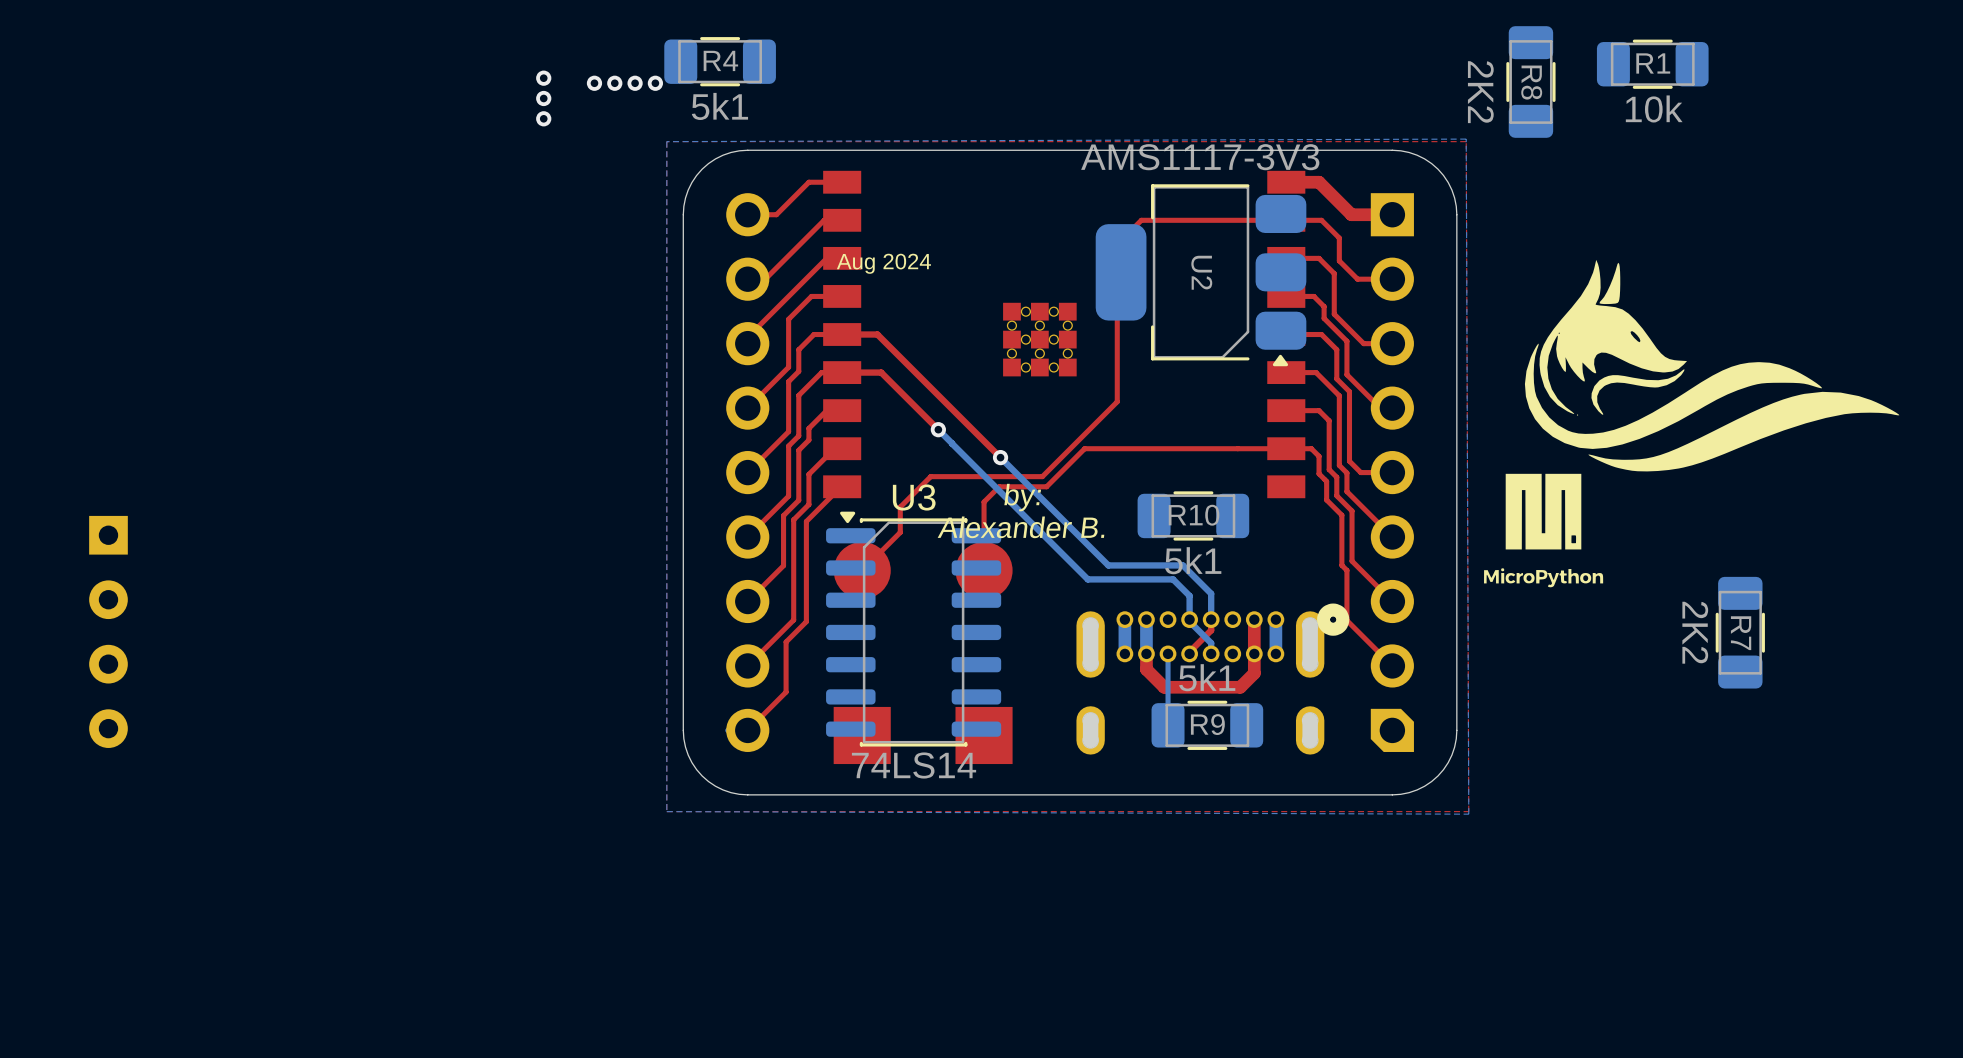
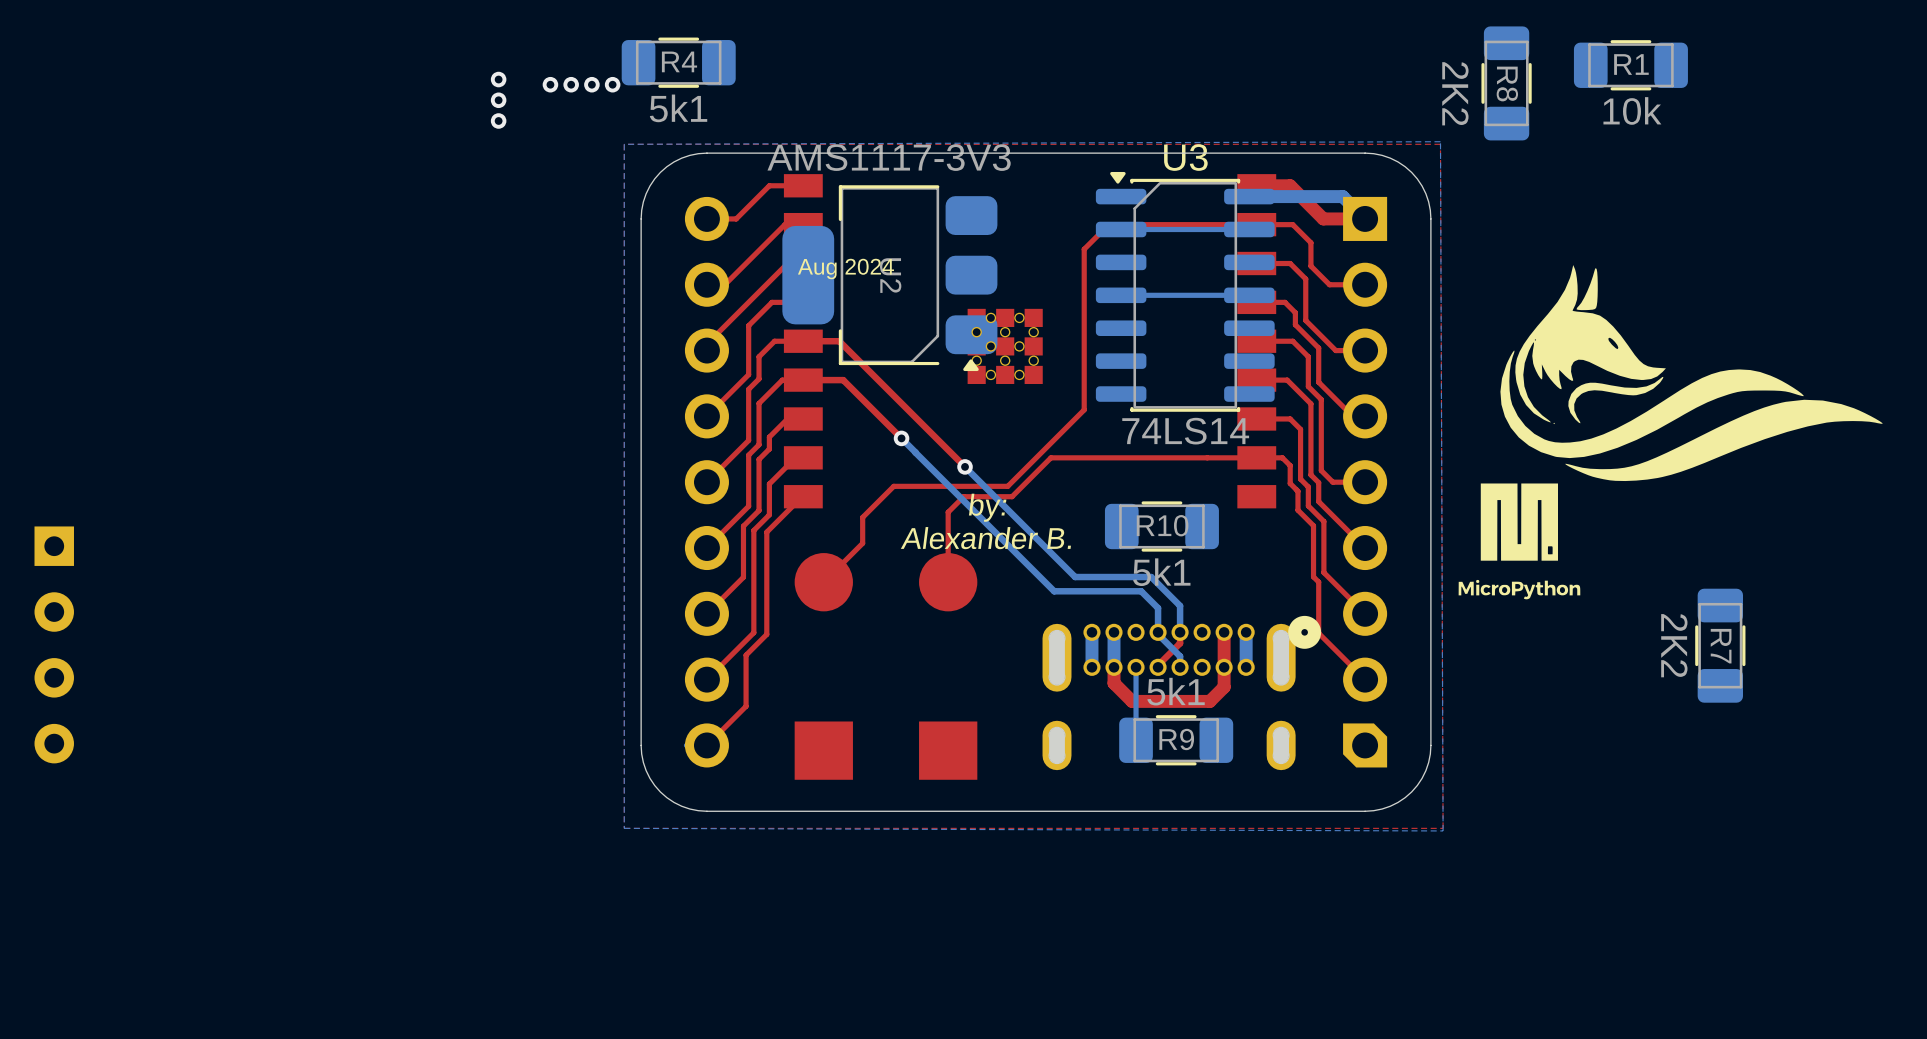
bottom track: none -> (1249, 196) (1342, 196) (1365, 218)
bottom track: none -> (1249, 229) (1121, 229)
U2 position: (1201, 275) -> (889, 278)
bottom track: none -> (1249, 295) (1121, 295)
U3 position: (913, 629) -> (1185, 291)

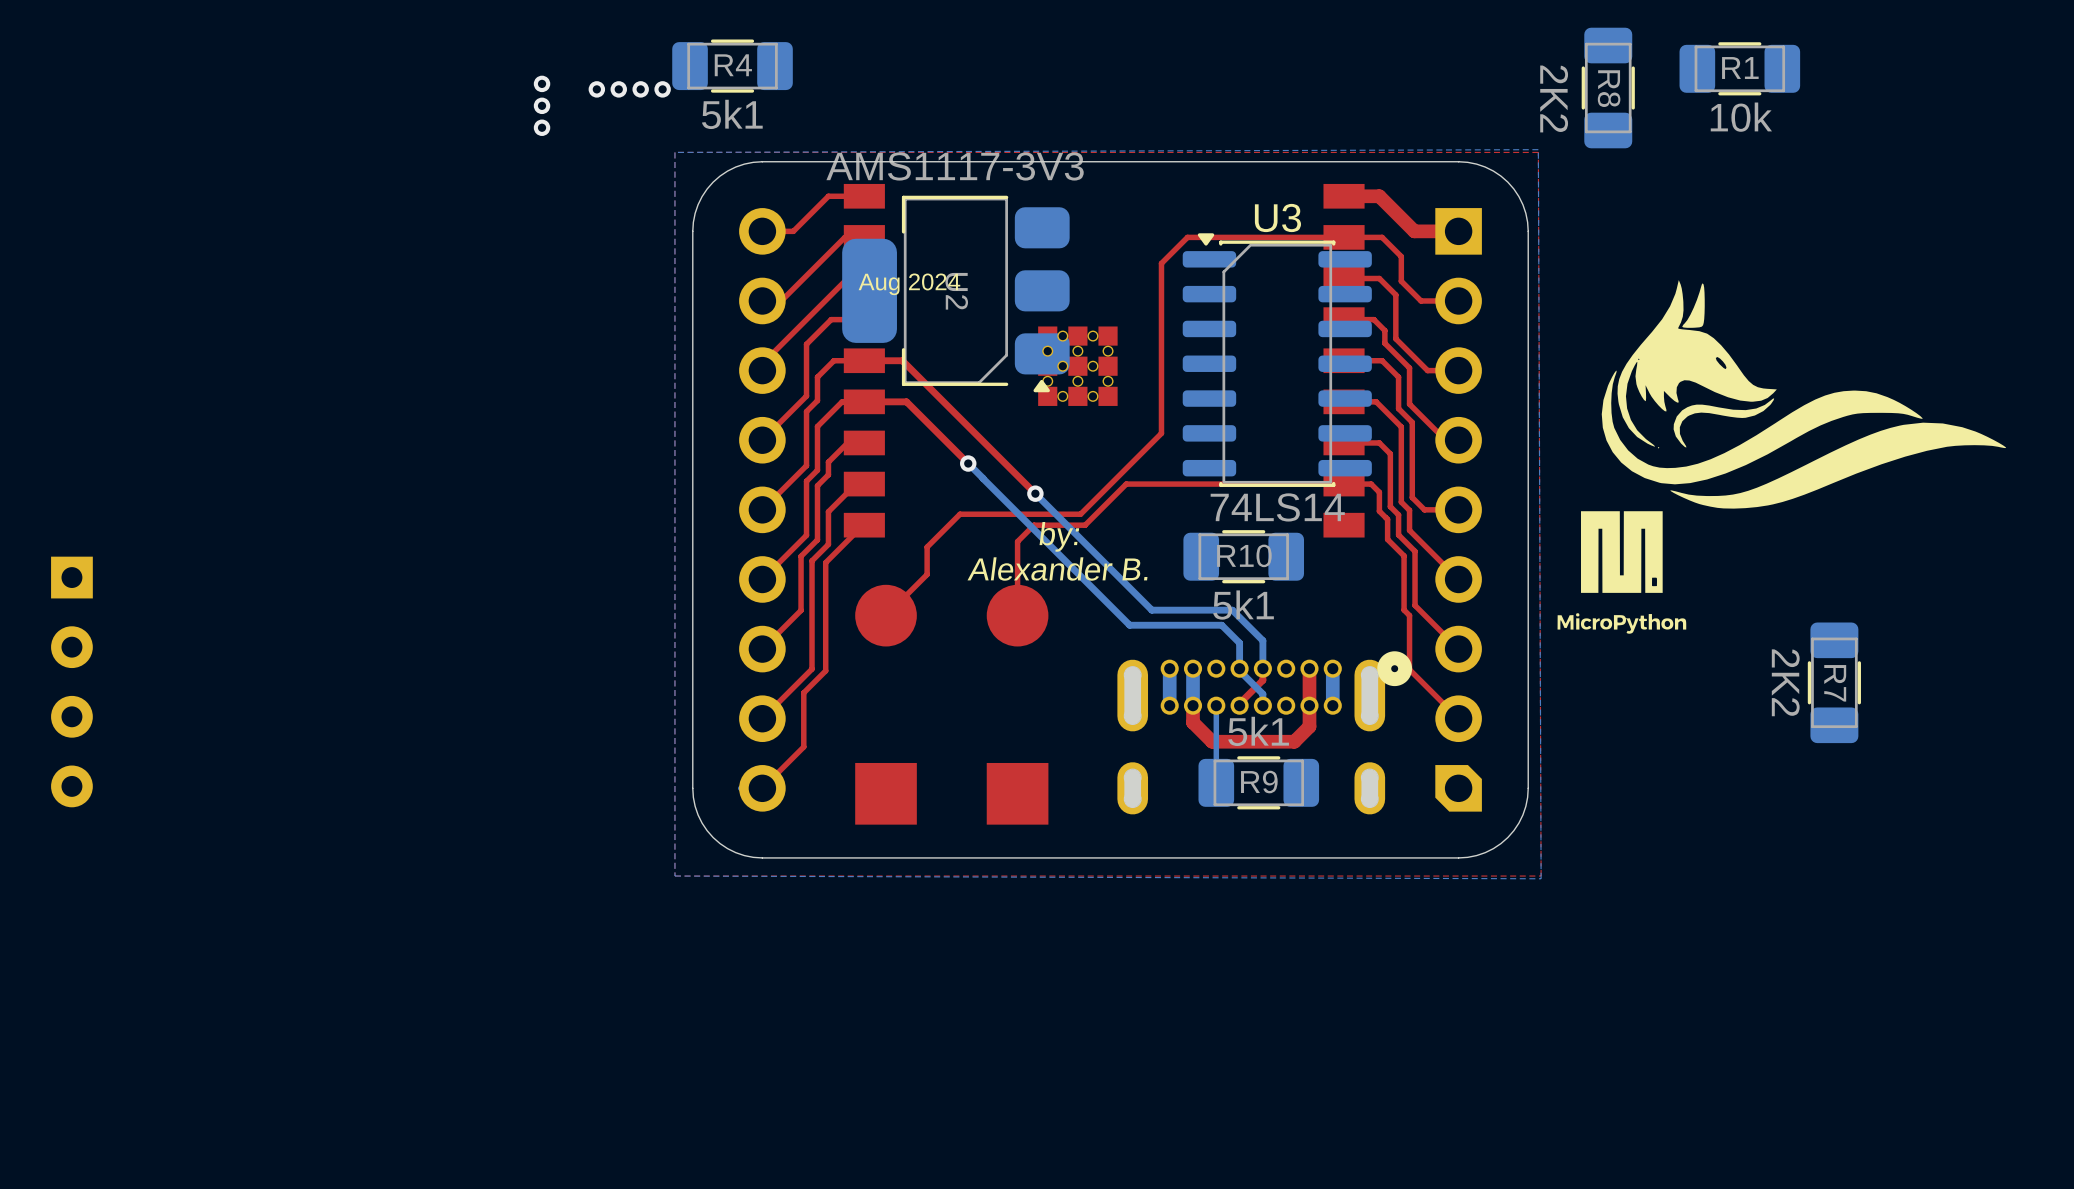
bottom track: (1249, 196) (1342, 196) (1365, 218) -> none
bottom track: (1249, 229) (1121, 229) -> none
U3 position: (1185, 291) -> (1277, 360)
bottom track: (1249, 295) (1121, 295) -> none

